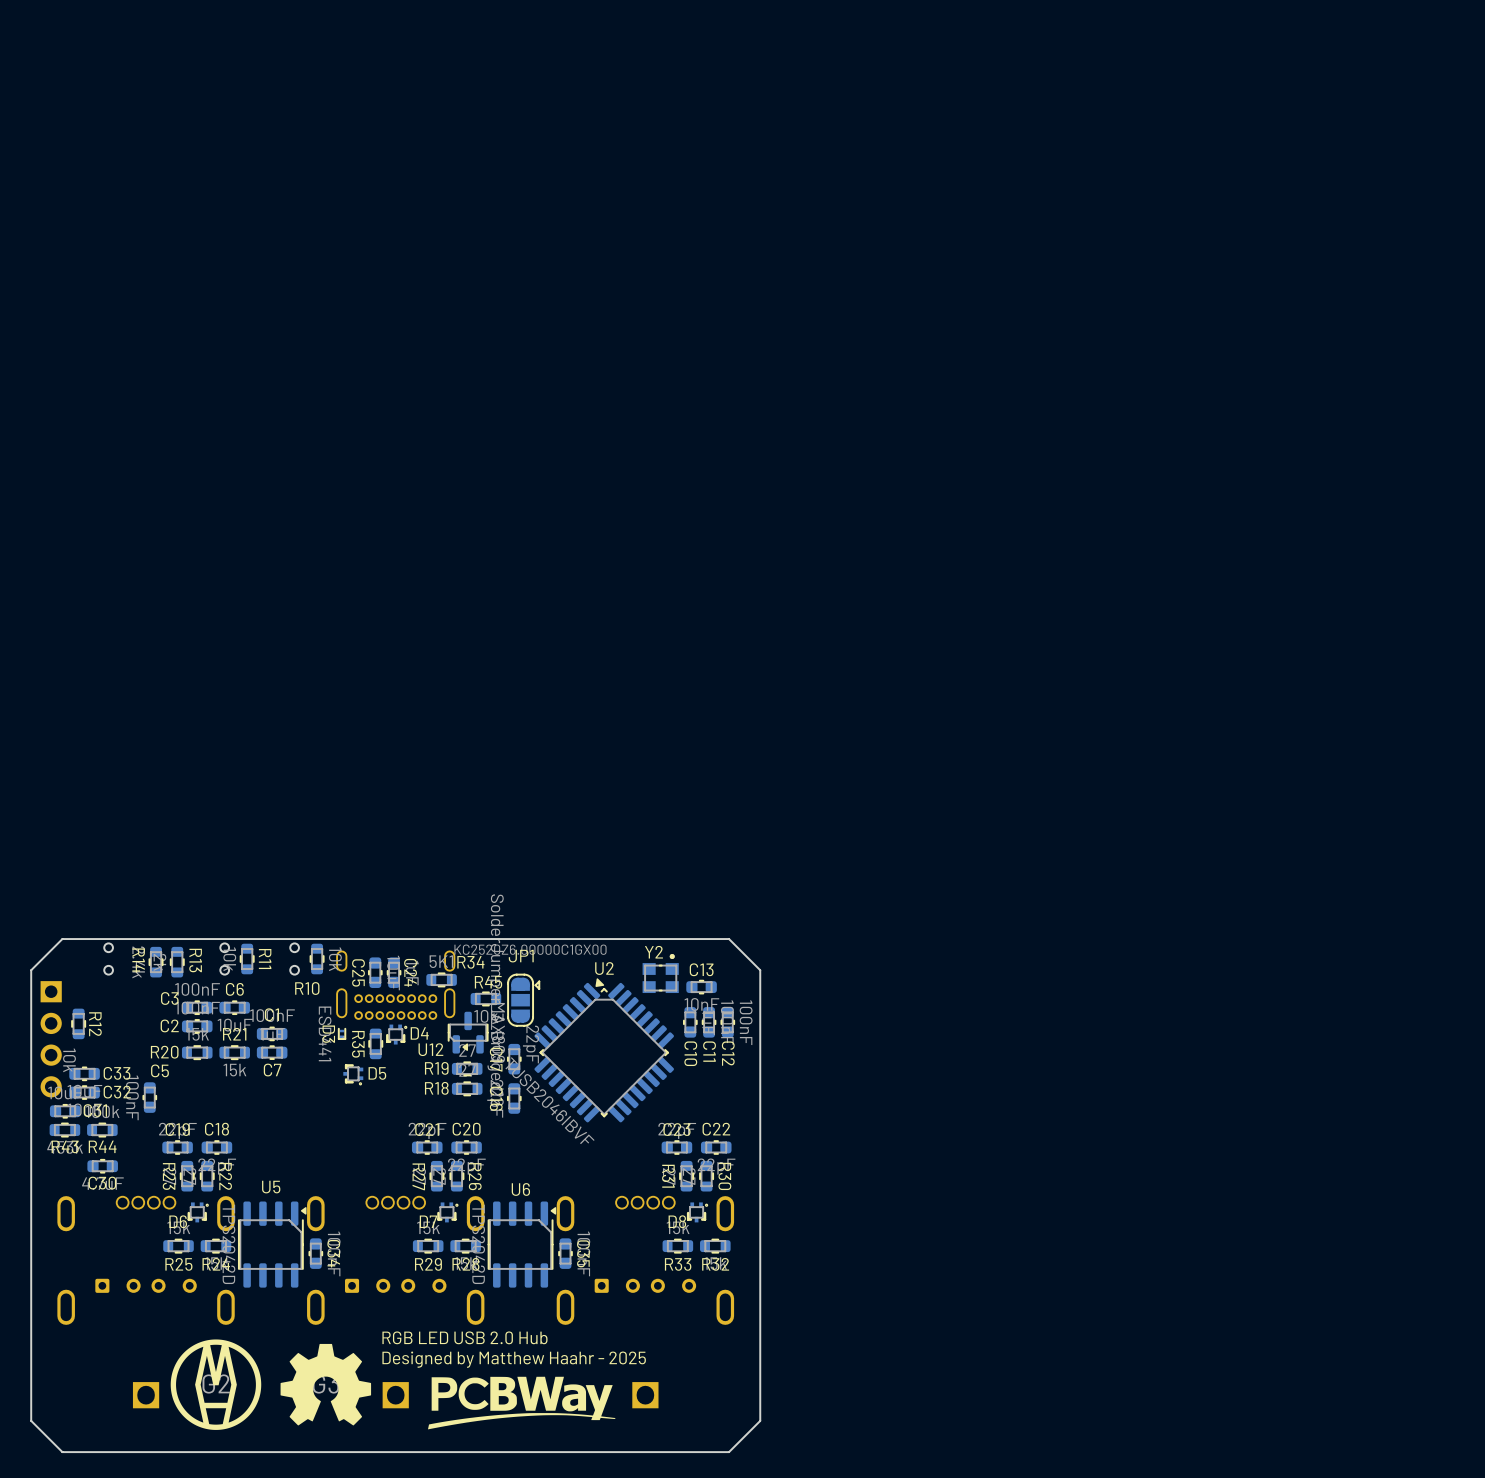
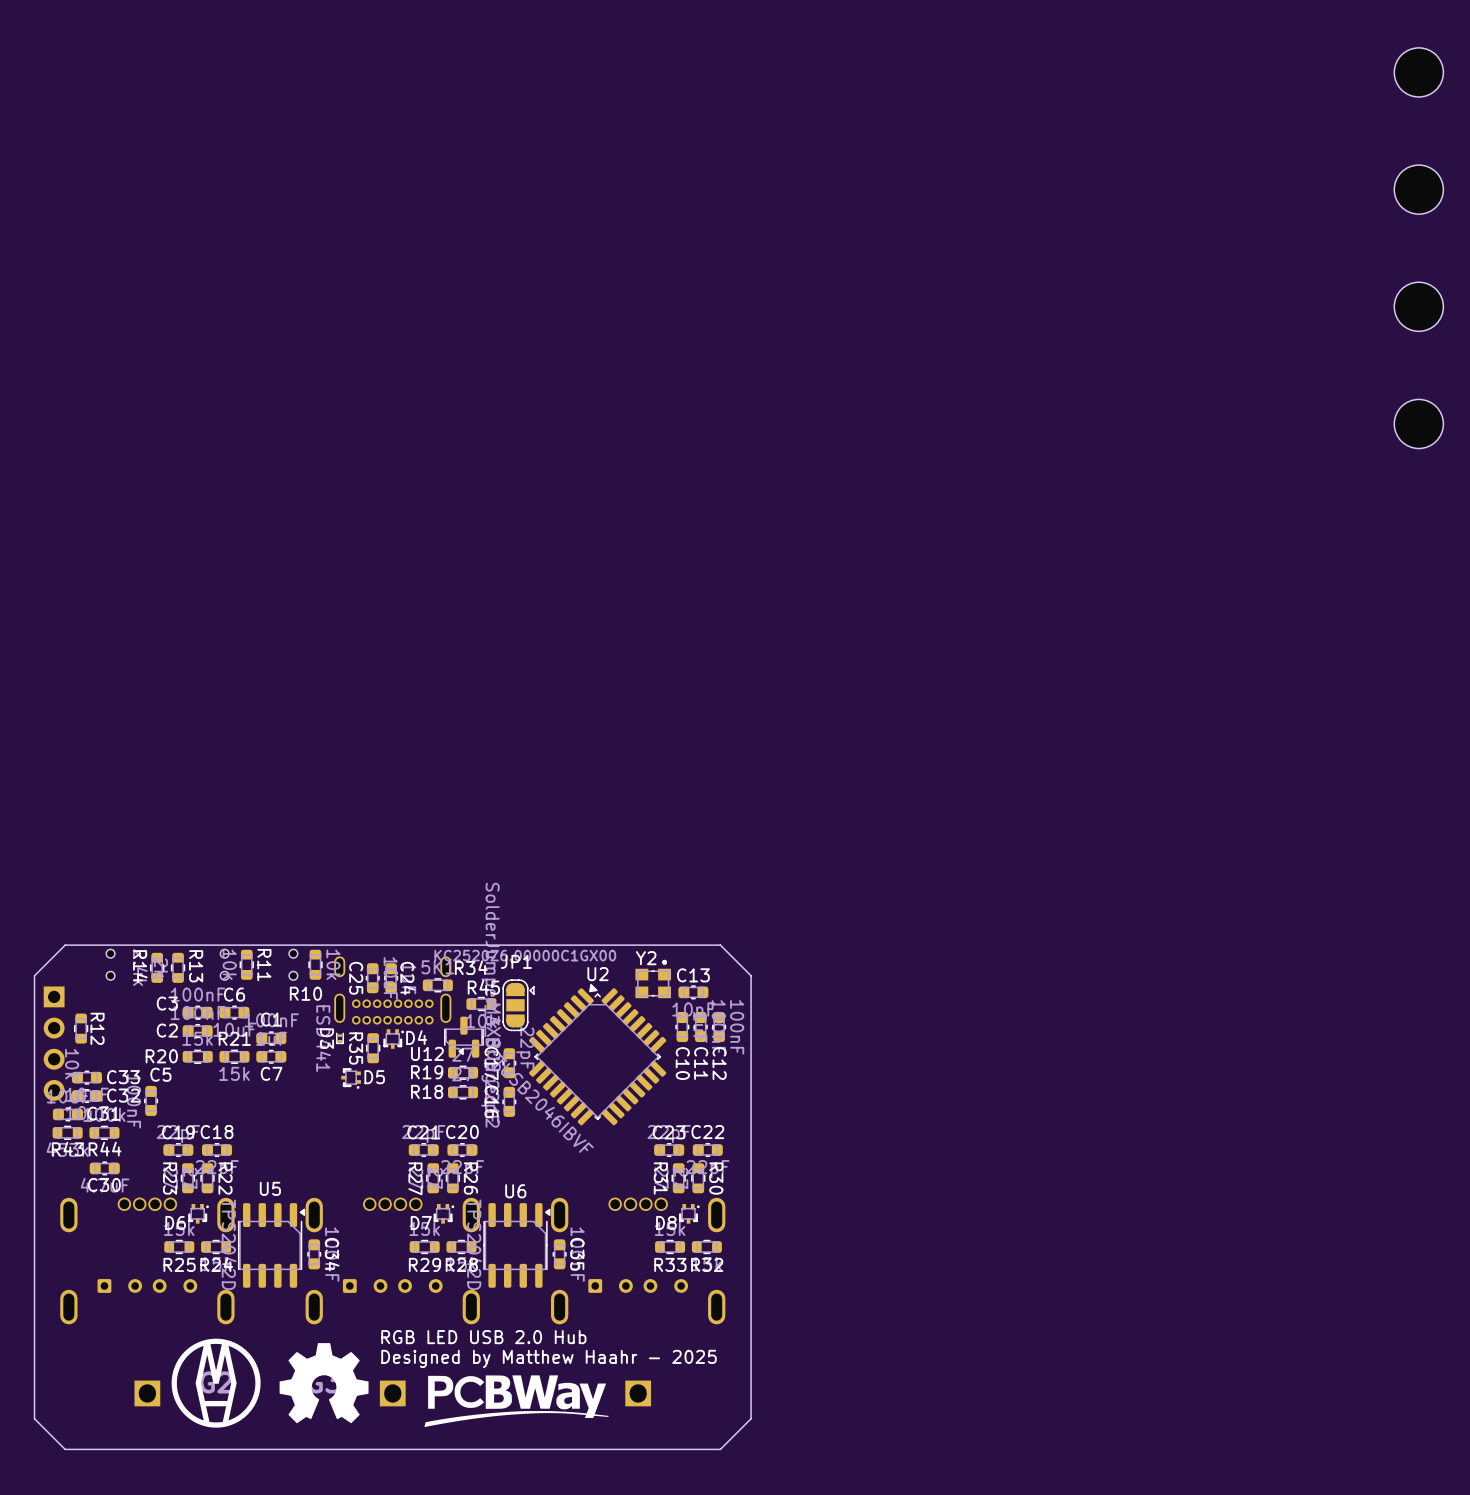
part: none -> (1418, 72)
part: none -> (1418, 189)
part: none -> (1418, 306)
part: none -> (1418, 423)

